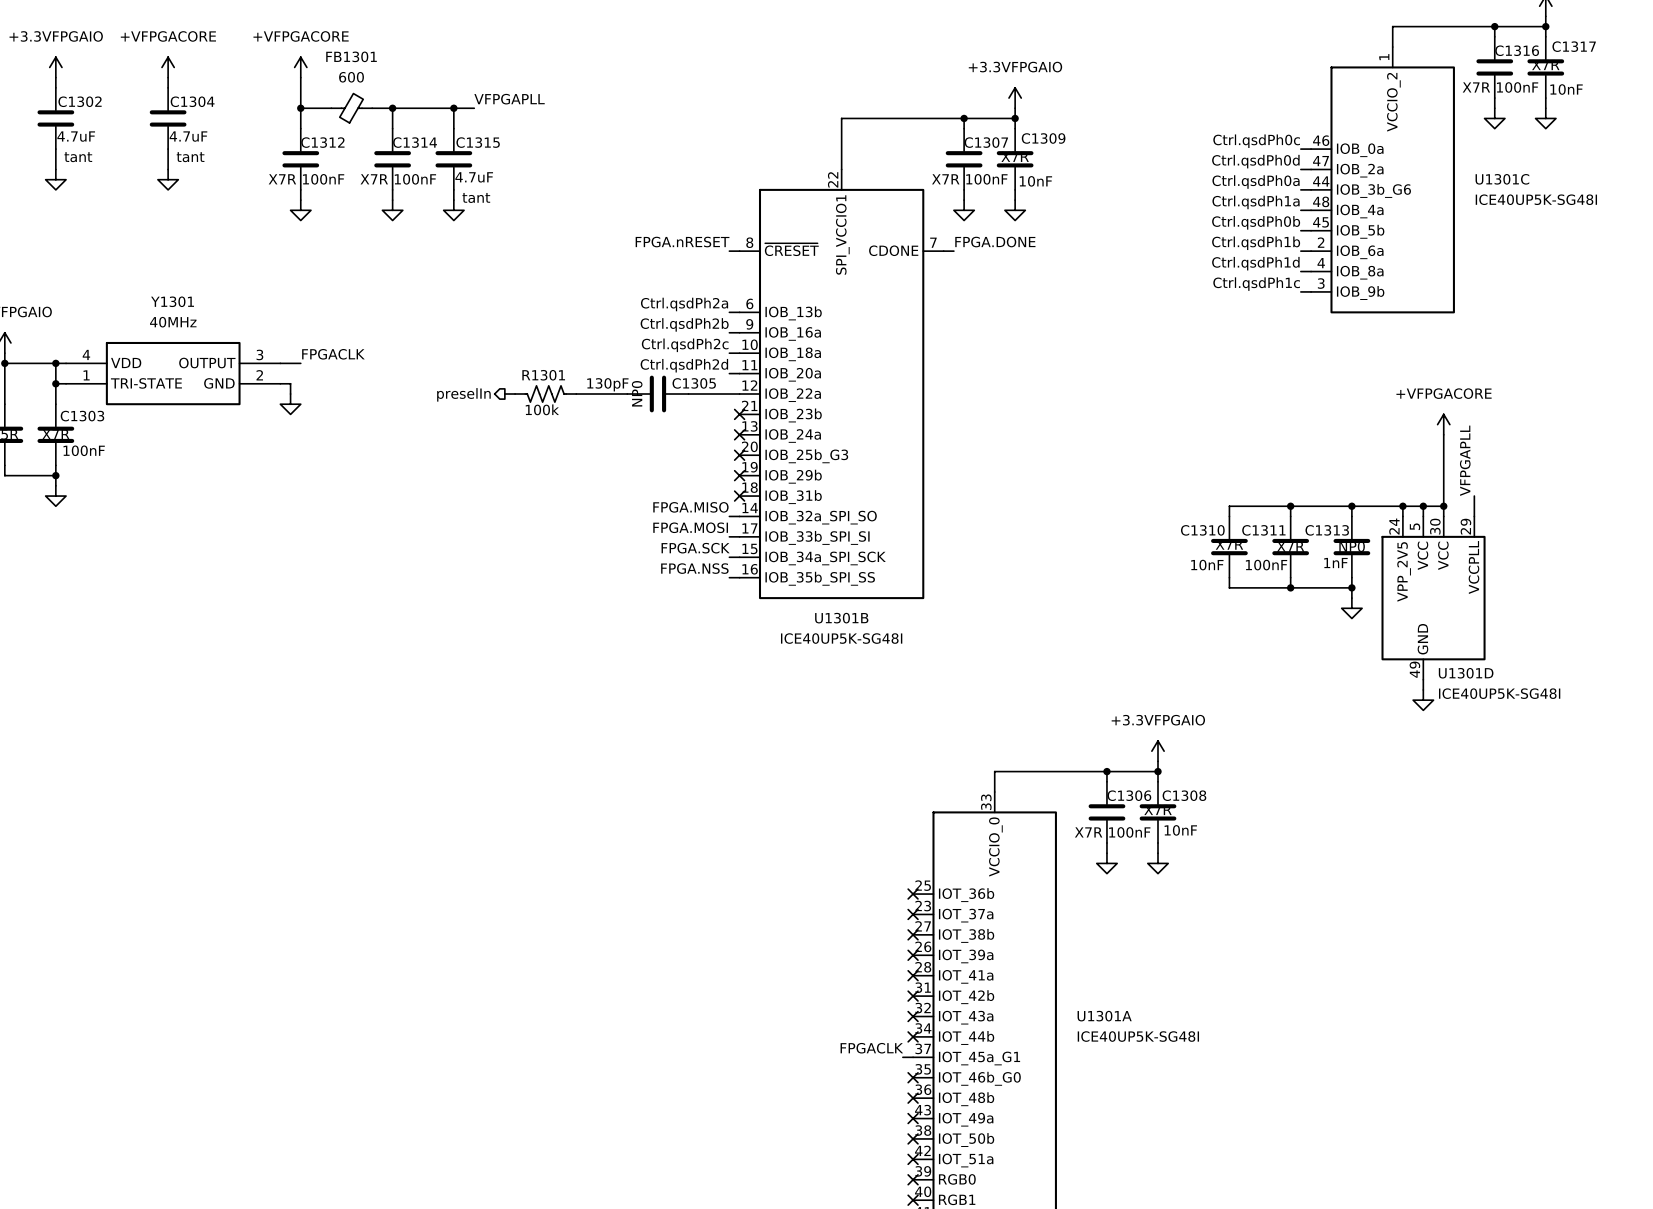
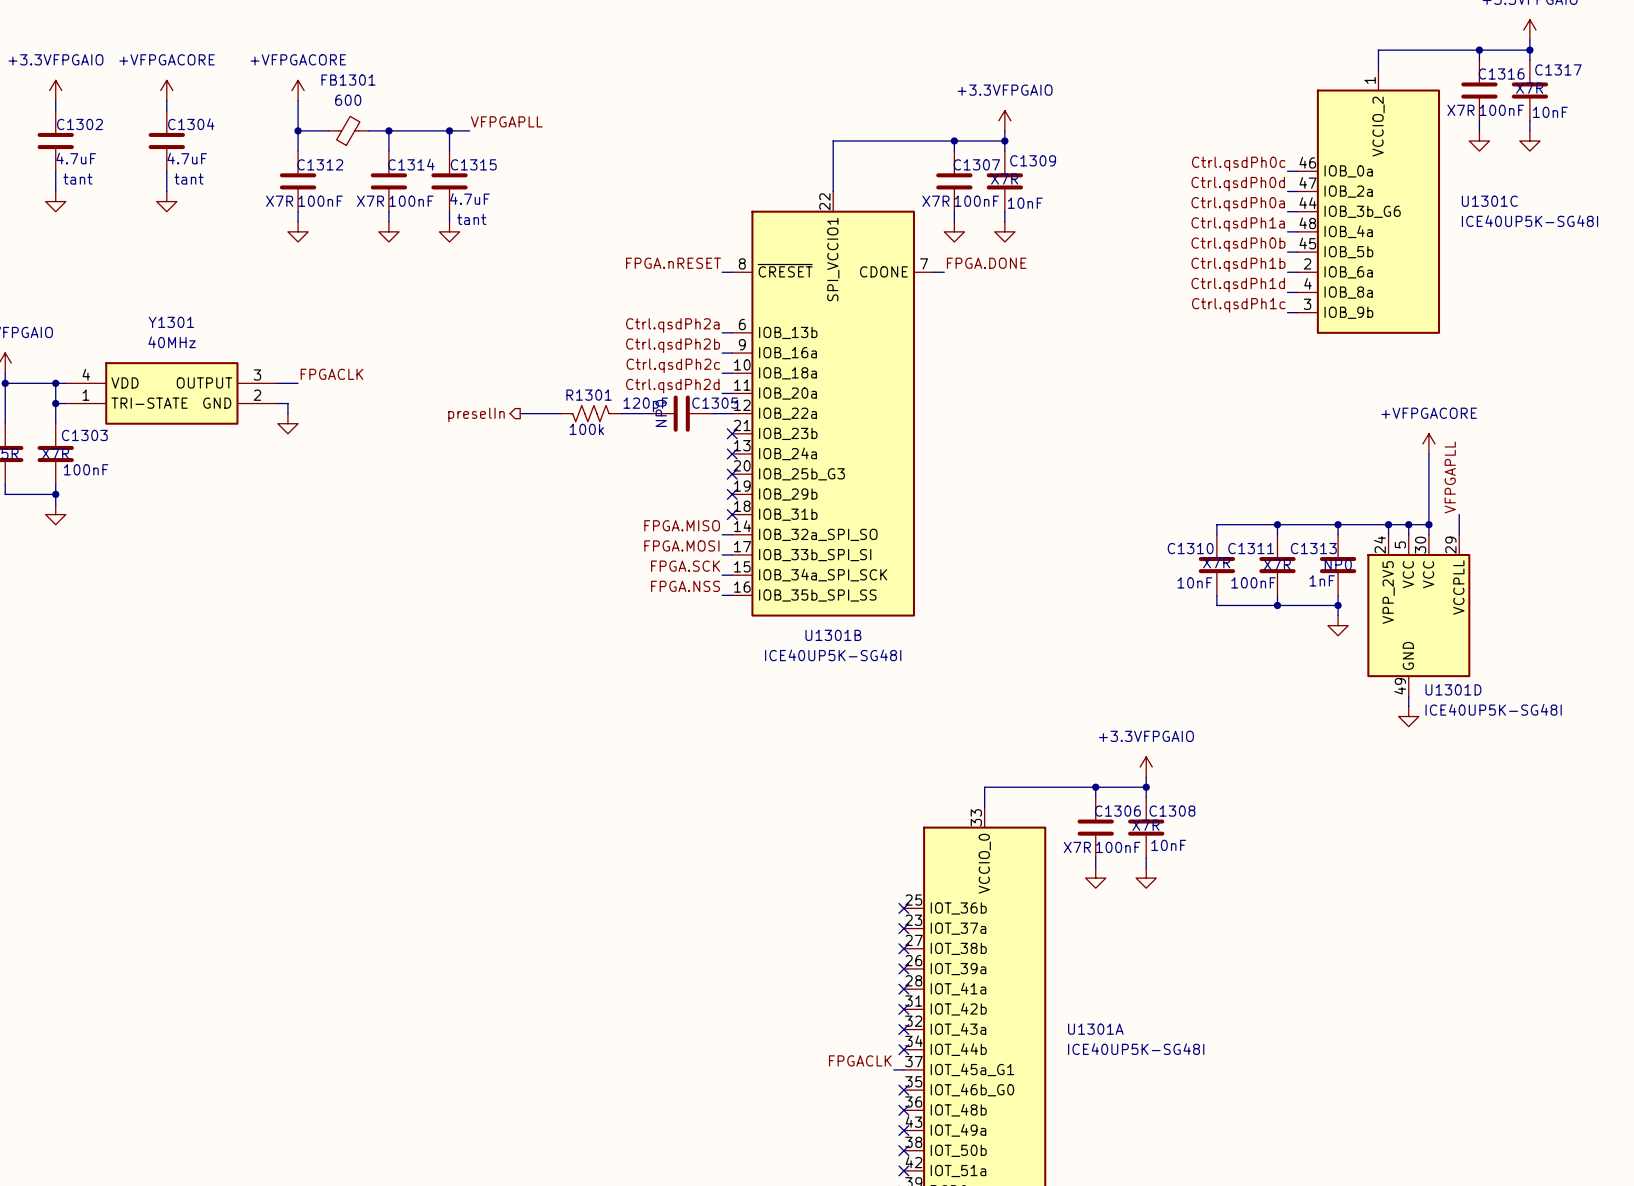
C1305 value: 130pF (607, 384) -> 120pF (645, 404)
hierarchical label position: preselIn (463, 394) -> preselIn (476, 414)
wire: (504, 394) (515, 394) -> none
wire: none -> (520, 413) (560, 413)
R1301 position: (545, 394) -> (590, 413)
C1305 position: (657, 394) -> (681, 413)

